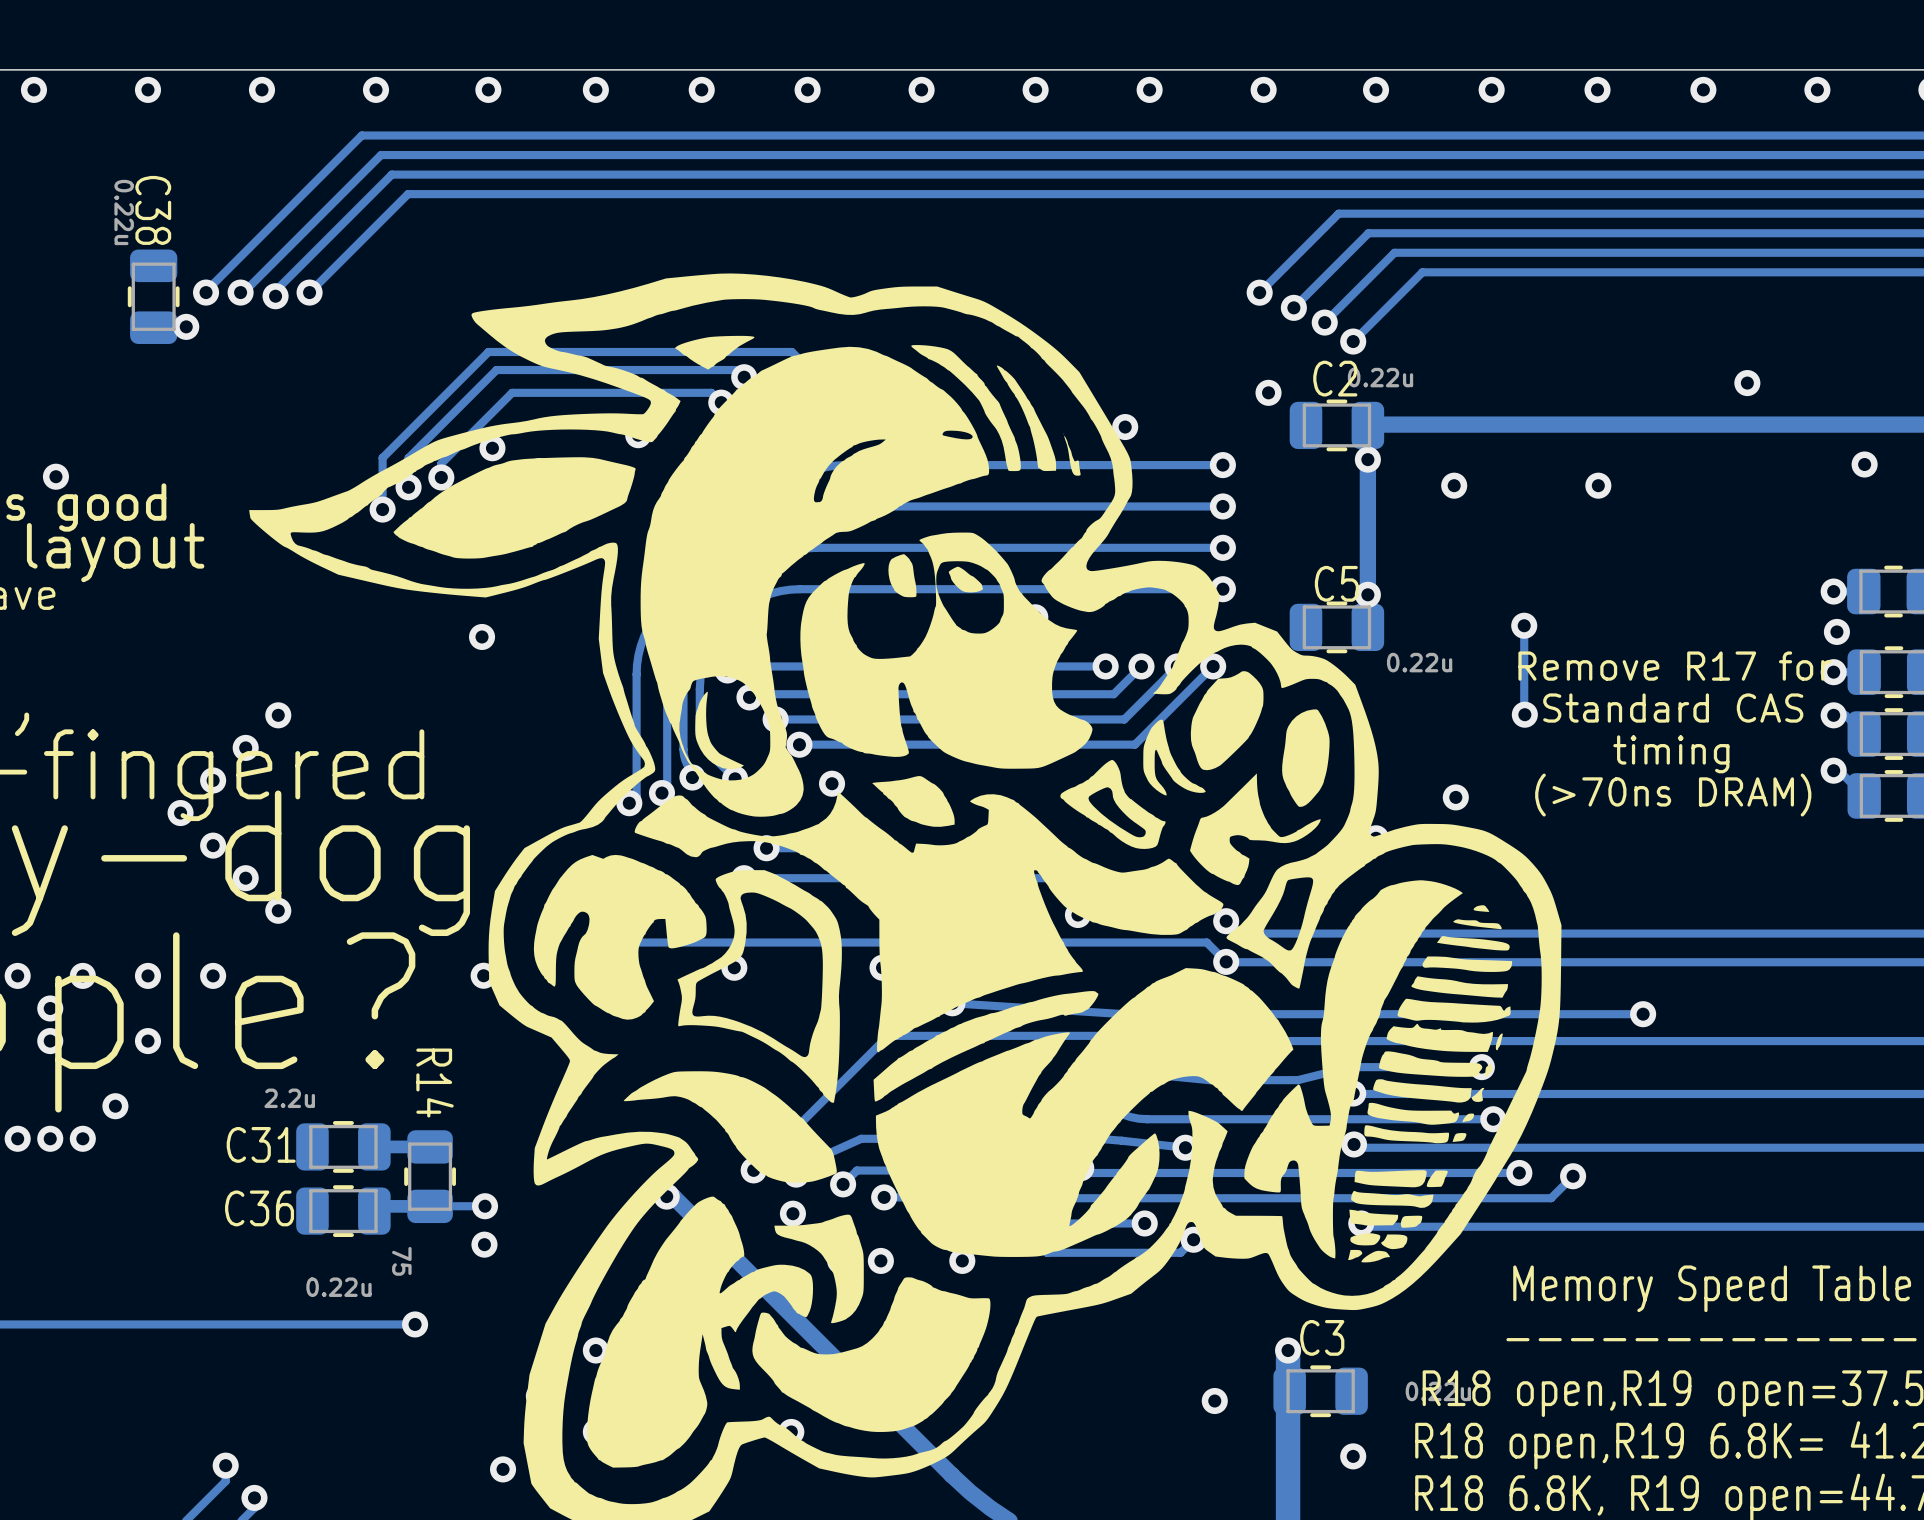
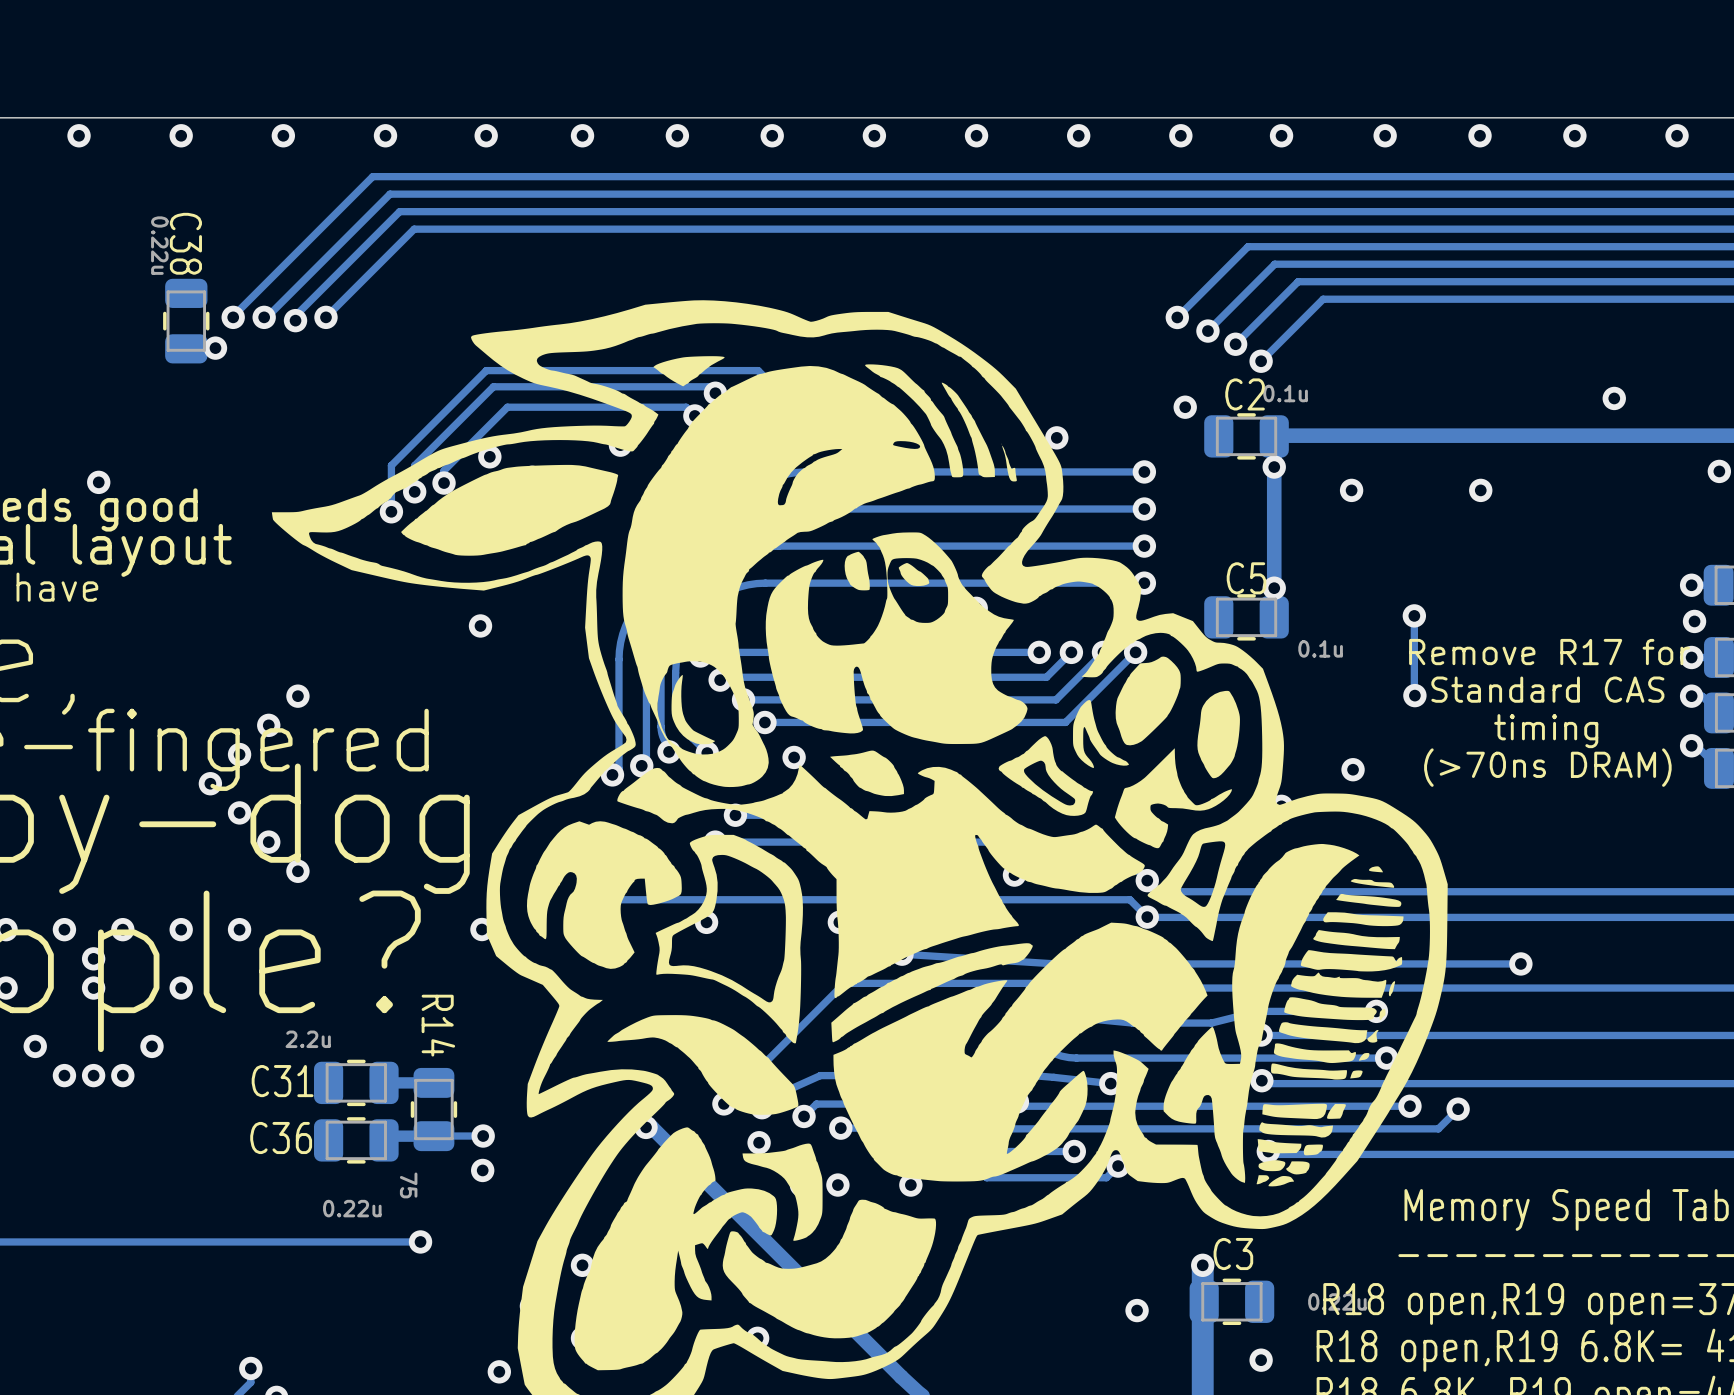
C2 value: 0.22u (1380, 377) -> 0.1u (1285, 393)
C5 value: 0.22u (1419, 662) -> 0.1u (1320, 648)

